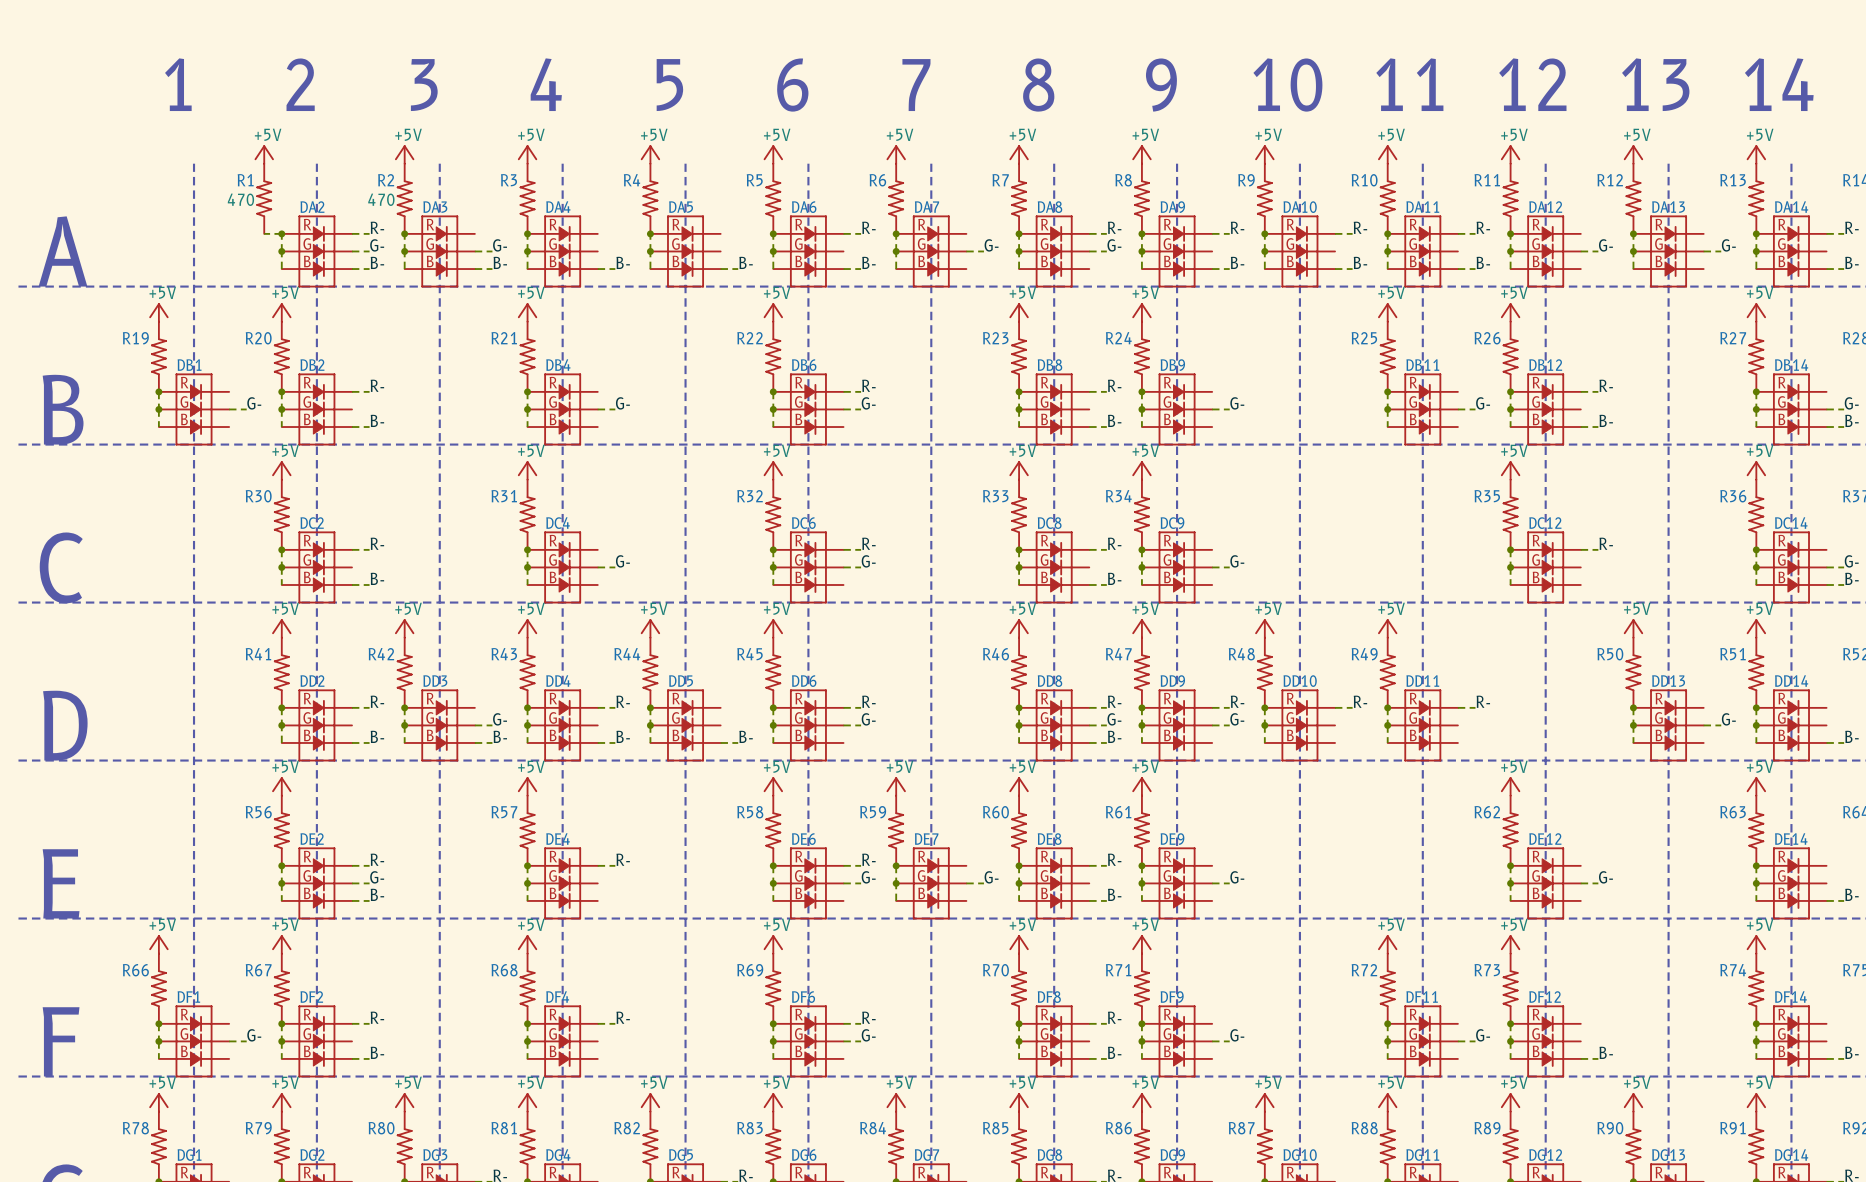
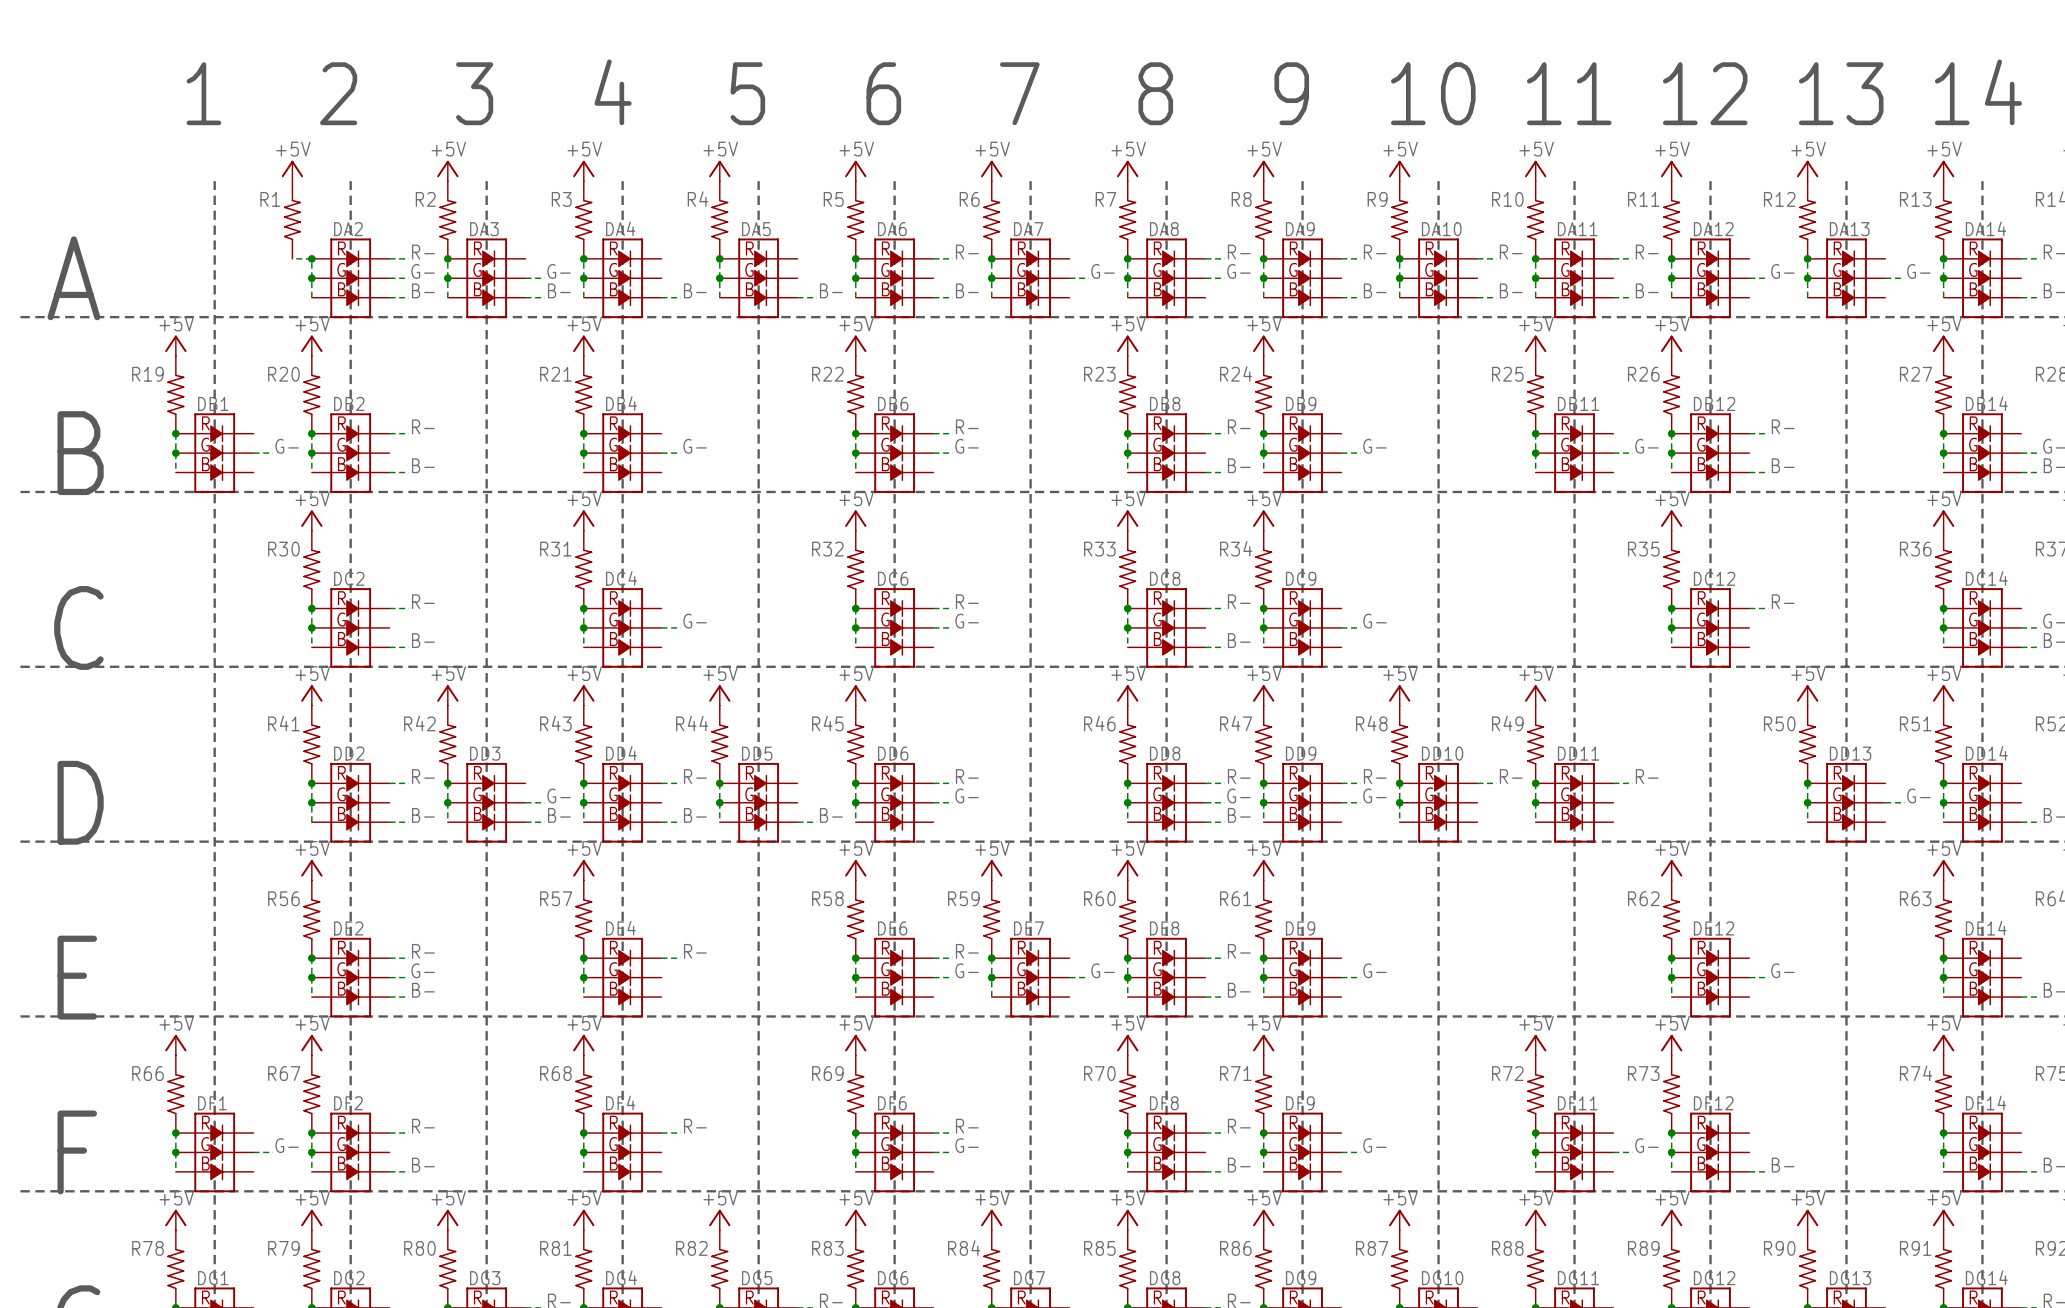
R1 value: 470 (240, 199) -> none
R2 value: 470 (381, 199) -> none

